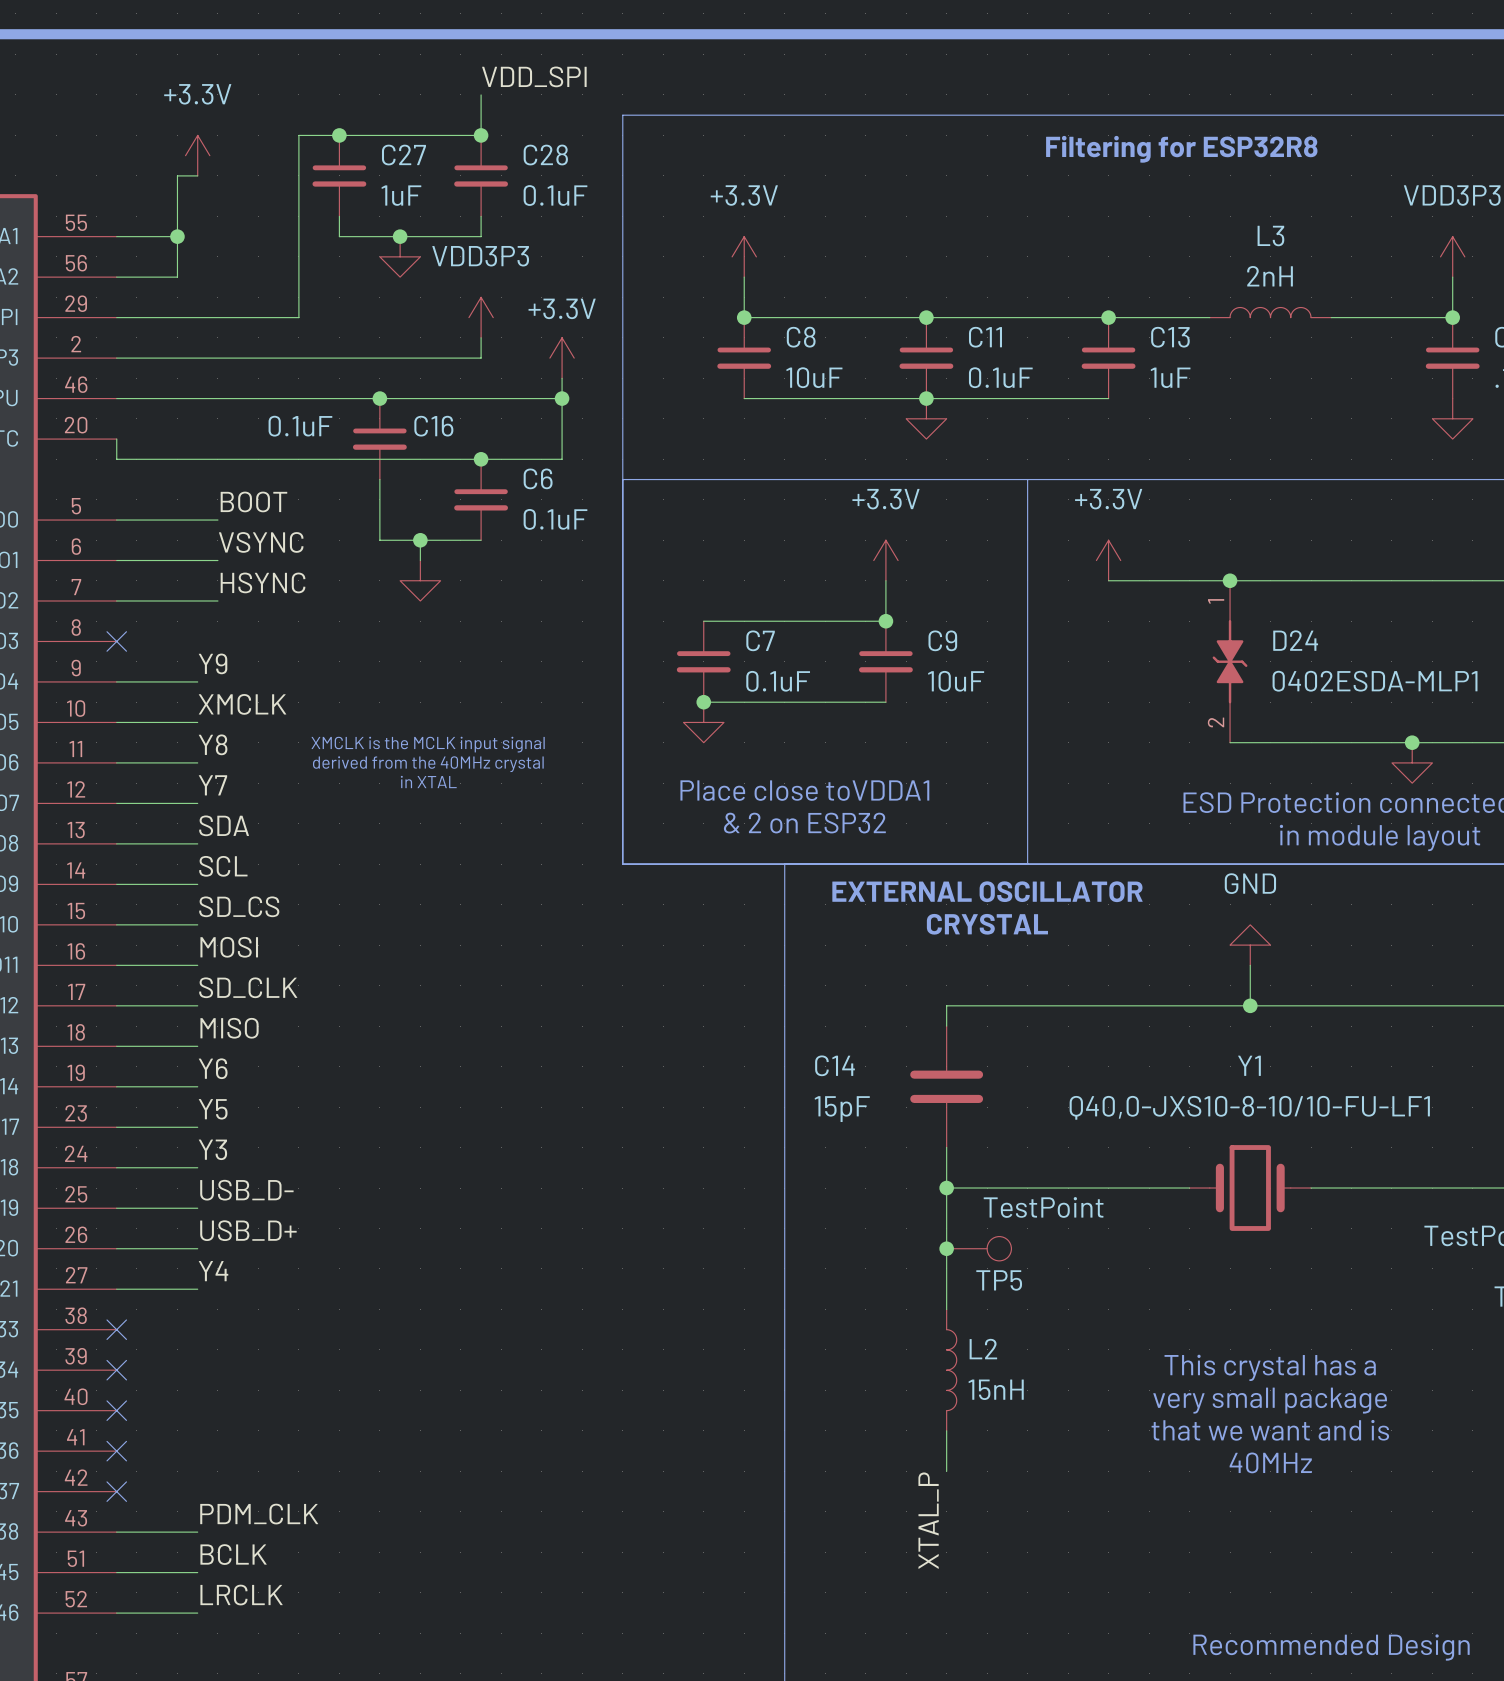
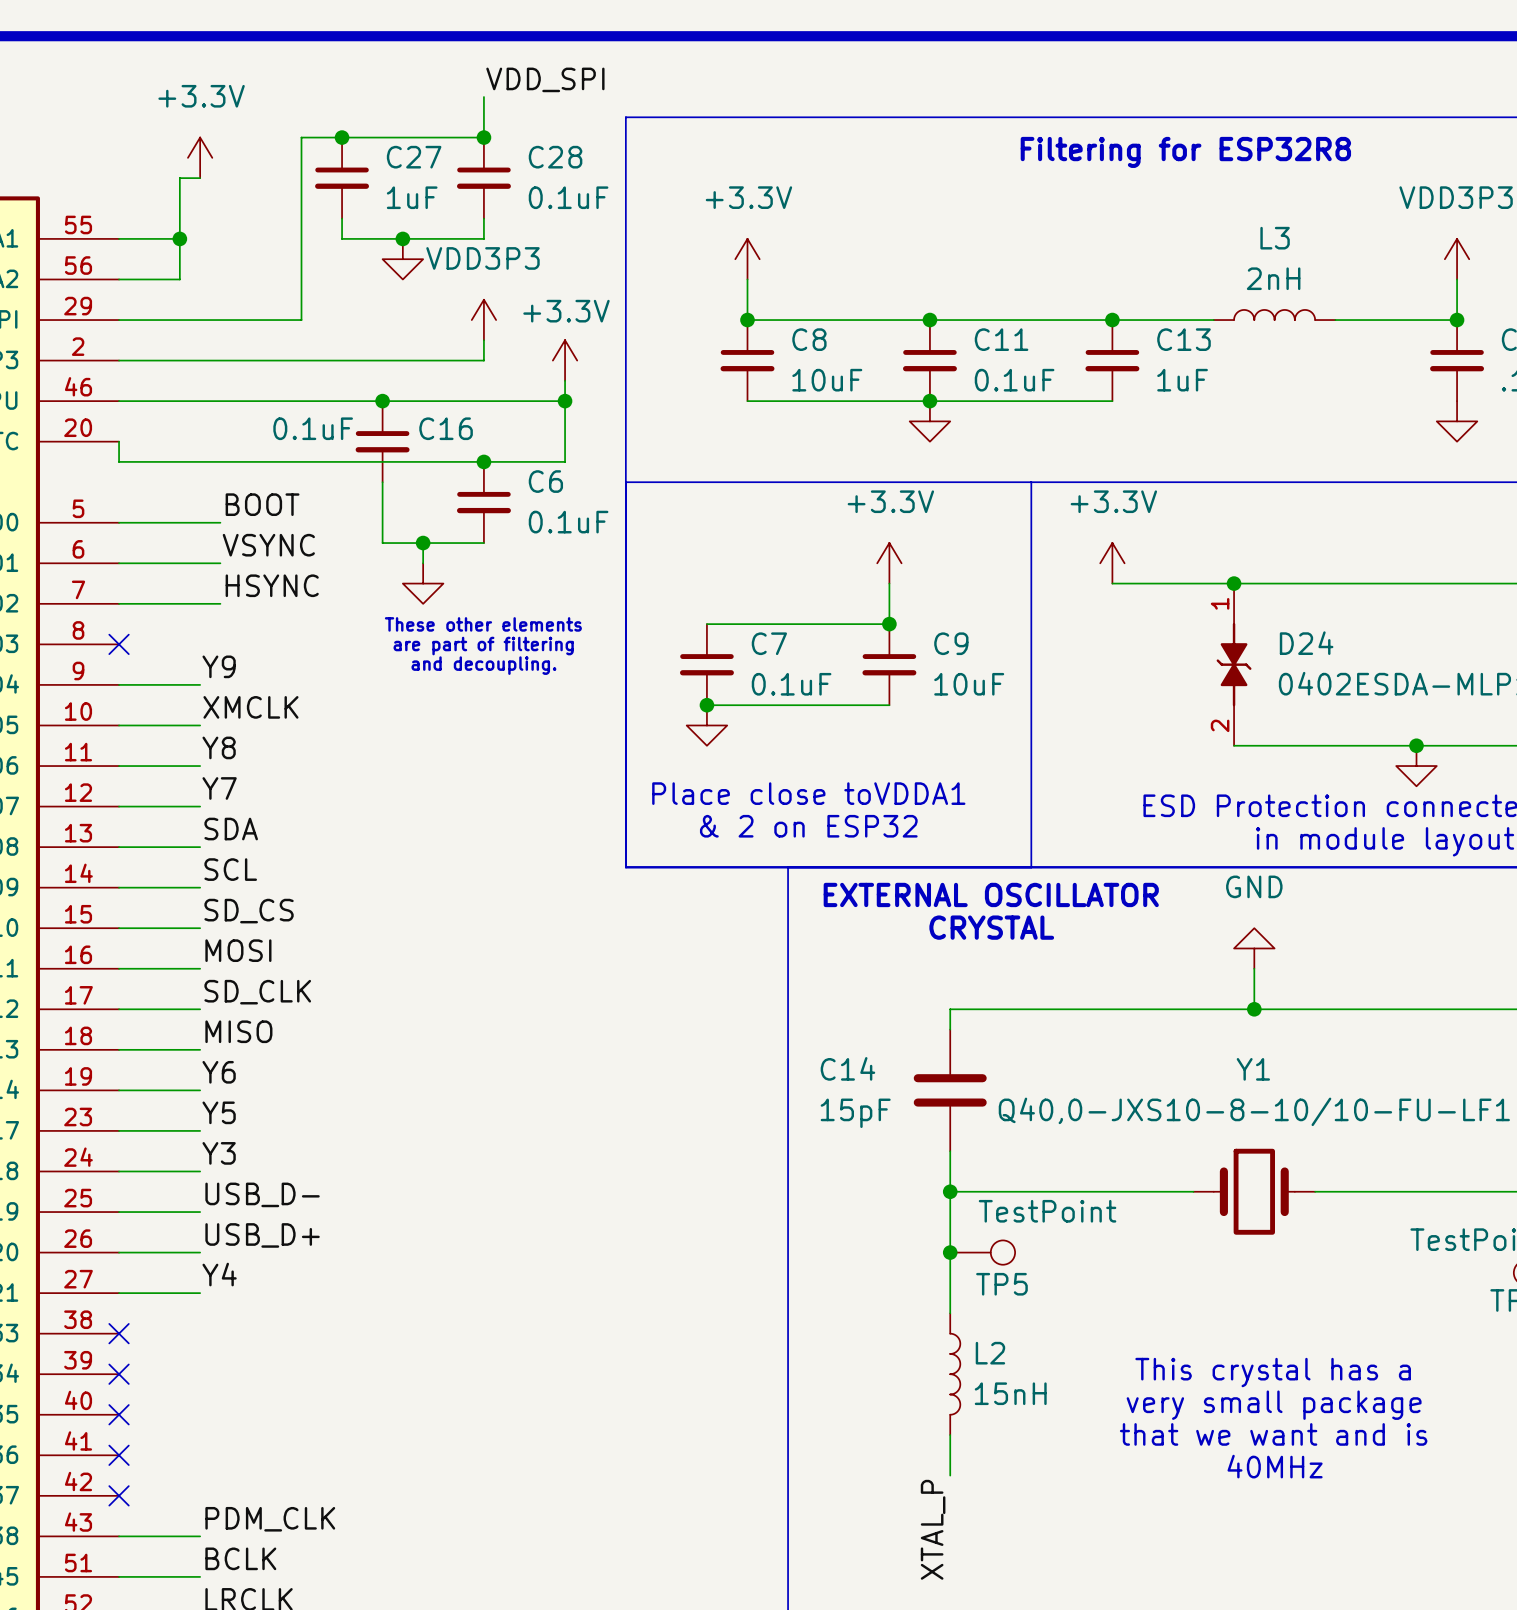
text: none -> These other elements (483, 624)
text: none -> are part of filtering (483, 646)
text: none -> and decoupling. (483, 665)
text: XMCLK is the MCLK input signal (428, 744) -> none
text: derived from the 40MHz crystal (428, 764) -> none
text: in XTAL (428, 782) -> none

